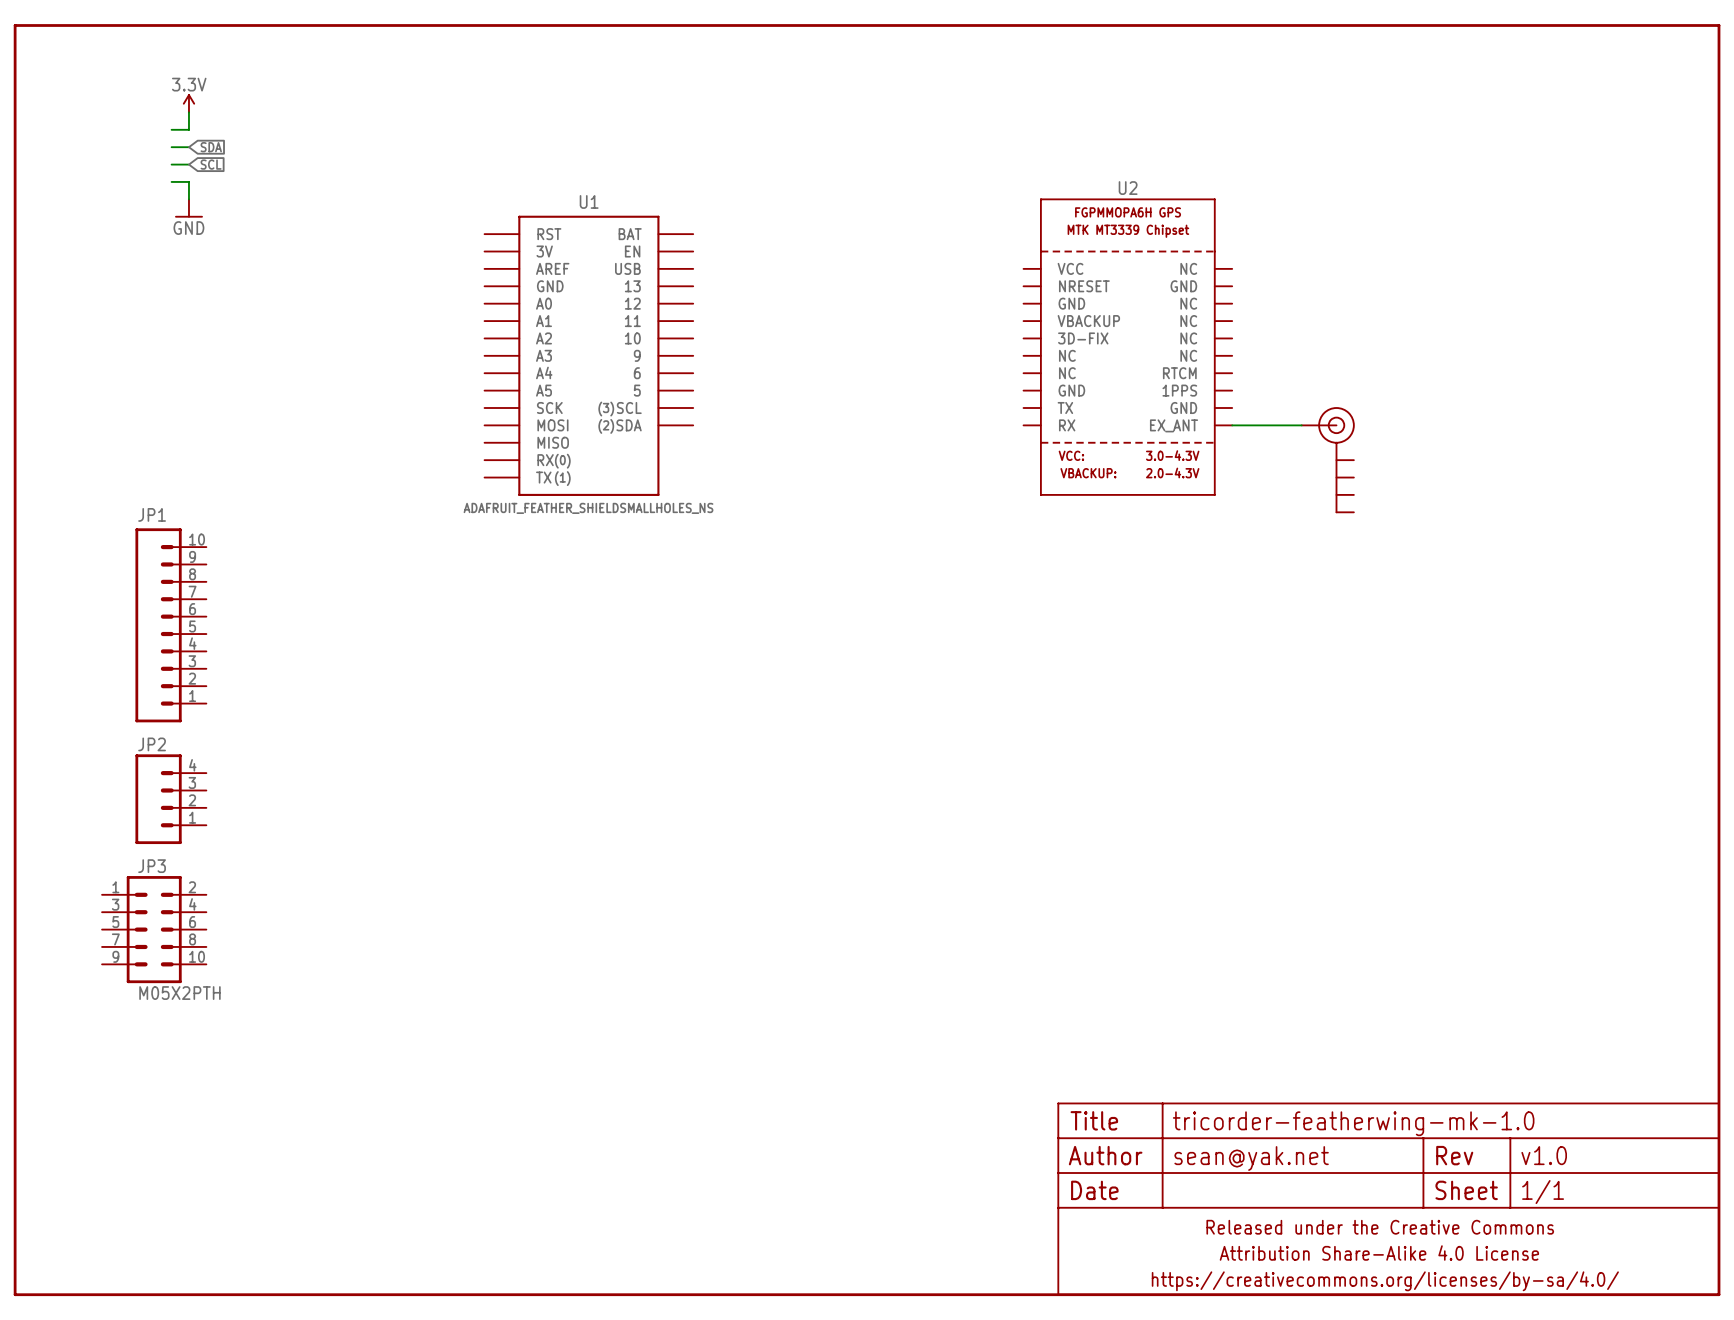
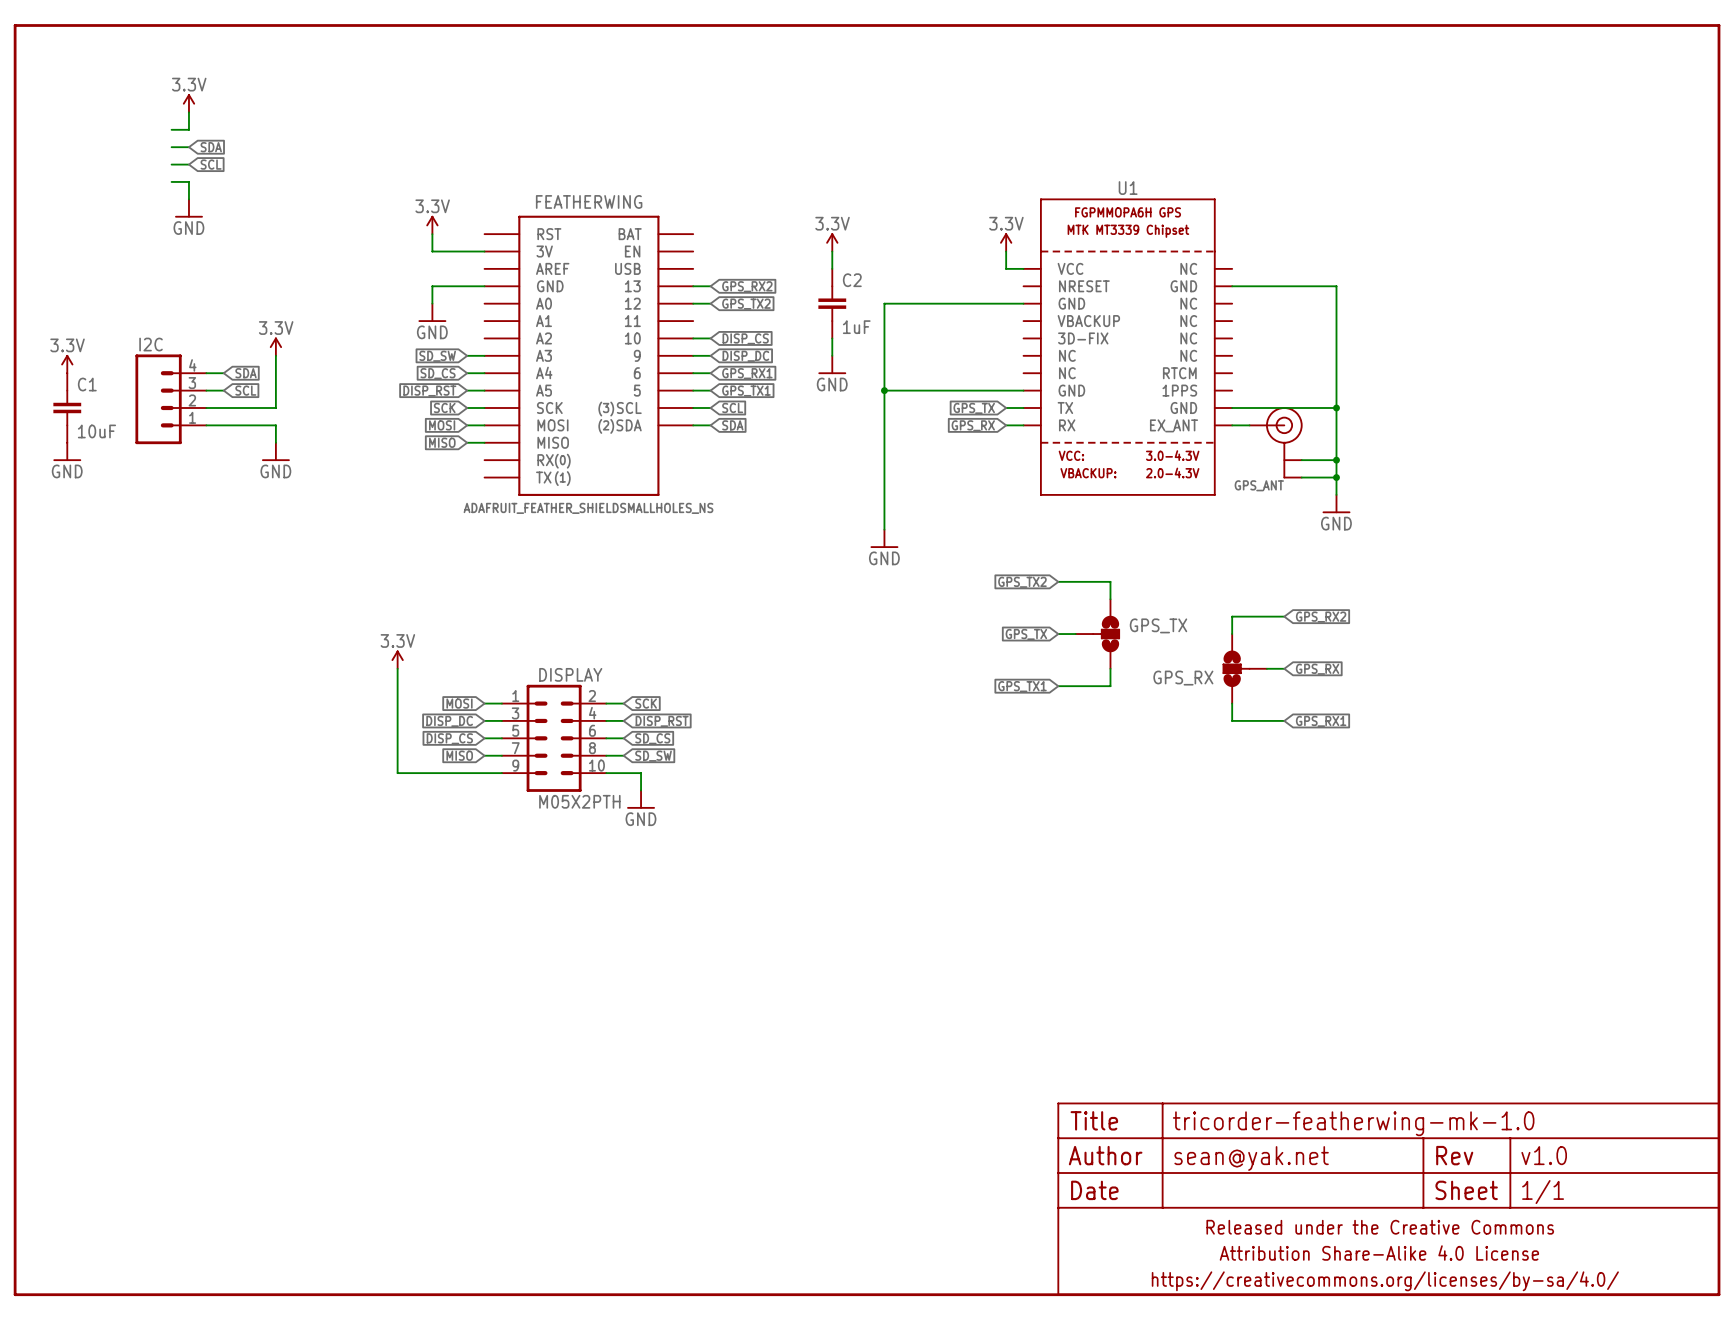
U2 name: U2 (1128, 188) -> U1 (1128, 188)
U1 name: U1 (589, 201) -> FEATHERWING (589, 201)
power symbol: none -> 3.3V (432, 225)
wire: none -> (432, 234) (432, 251) (484, 251)
power symbol: none -> 3.3V (832, 242)
power symbol: none -> 3.3V (1006, 242)
wire: none -> (832, 251) (832, 268)
wire: none -> (1006, 251) (1006, 268) (1023, 268)
wire: none -> (484, 286) (432, 286) (432, 303)
wire: none -> (693, 286) (710, 286)
global label: none -> GPS_RX2 (747, 286)
wire: none -> (1232, 286) (1336, 286) (1336, 494)
wire: none -> (693, 303) (710, 303)
C2: none -> 1uF (832, 303)
wire: none -> (1023, 303) (884, 303) (884, 529)
global label: none -> GPS_TX2 (746, 304)
power symbol: none -> GND (432, 312)
wire: none -> (693, 338) (710, 338)
global label: none -> DISP_CS (745, 338)
wire: none -> (832, 338) (832, 355)
power symbol: none -> 3.3V (275, 346)
wire: none -> (275, 355) (275, 407) (206, 407)
wire: none -> (467, 355) (484, 355)
wire: none -> (693, 355) (710, 355)
global label: none -> SD_SW (437, 356)
global label: none -> DISP_DC (745, 356)
power symbol: none -> 3.3V (67, 364)
power symbol: none -> GND (832, 364)
wire: none -> (206, 373) (223, 373)
global label: none -> SDA (246, 373)
global label: none -> SD_CS (438, 373)
wire: none -> (467, 373) (484, 373)
wire: none -> (693, 373) (710, 373)
global label: none -> GPS_RX1 (747, 373)
wire: none -> (206, 390) (223, 390)
global label: none -> SCL (245, 390)
wire: none -> (467, 390) (484, 390)
wire: none -> (693, 390) (710, 390)
wire: none -> (884, 390) (1023, 390)
junction: none -> (884, 390)
global label: none -> DISP_RST (429, 391)
global label: none -> GPS_TX1 (746, 391)
I2C: none -> (170, 399)
C1: none -> 10uF (67, 407)
global label: none -> SCK (444, 407)
wire: none -> (467, 407) (484, 407)
wire: none -> (693, 407) (710, 407)
global label: none -> SCL (732, 407)
wire: none -> (1006, 407) (1023, 407)
wire: none -> (1232, 407) (1336, 407)
junction: none -> (1336, 407)
global label: none -> GPS_TX (974, 408)
wire: none -> (206, 425) (275, 425) (275, 442)
global label: none -> MOSI (442, 425)
wire: none -> (467, 425) (484, 425)
wire: none -> (693, 425) (710, 425)
global label: none -> SDA (732, 425)
global label: none -> GPS_RX (973, 425)
wire: none -> (1006, 425) (1023, 425)
global label: none -> MISO (442, 442)
wire: none -> (467, 442) (484, 442)
GPS_ANT: none -> (1276, 442)
power symbol: none -> GND (67, 451)
power symbol: none -> GND (275, 451)
wire: none -> (1301, 460) (1336, 460)
part: (1328, 460) -> none
junction: none -> (1336, 460)
wire: none -> (1301, 477) (1336, 477)
junction: none -> (1336, 477)
power symbol: none -> GND (1336, 504)
power symbol: none -> GND (884, 538)
wire: none -> (1058, 581) (1110, 581) (1110, 599)
global label: none -> GPS_TX2 (1022, 582)
wire: none -> (1284, 616) (1232, 616) (1232, 634)
global label: none -> GPS_RX2 (1321, 617)
JP1: (170, 625) -> none
global label: none -> GPS_TX (1026, 634)
wire: none -> (1058, 634) (1075, 634)
GPS_TX: none -> (1097, 634)
power symbol: none -> 3.3V (397, 659)
wire: none -> (397, 668) (397, 773) (501, 773)
wire: none -> (1110, 668) (1110, 686) (1058, 686)
GPS_RX: none -> (1244, 668)
wire: none -> (1266, 668) (1284, 668)
global label: none -> GPS_RX (1317, 669)
global label: none -> GPS_TX1 (1022, 686)
global label: none -> MOSI (459, 703)
wire: none -> (484, 703) (501, 703)
wire: none -> (606, 703) (623, 703)
global label: none -> SCK (646, 703)
wire: none -> (1232, 703) (1232, 720) (1284, 720)
wire: none -> (484, 720) (501, 720)
wire: none -> (606, 720) (623, 720)
global label: none -> DISP_DC (449, 721)
global label: none -> DISP_RST (662, 721)
global label: none -> GPS_RX1 (1321, 721)
global label: none -> DISP_CS (449, 738)
wire: none -> (484, 738) (501, 738)
DISPLAY: none -> M05X2PTH (554, 738)
wire: none -> (606, 738) (623, 738)
global label: none -> SD_CS (652, 738)
global label: none -> MISO (459, 755)
wire: none -> (484, 755) (501, 755)
wire: none -> (606, 755) (623, 755)
global label: none -> SD_SW (653, 756)
wire: none -> (606, 773) (641, 773) (641, 790)
JP2: (170, 799) -> none
power symbol: none -> GND (641, 799)
JP3: M05X2PTH (154, 929) -> none

